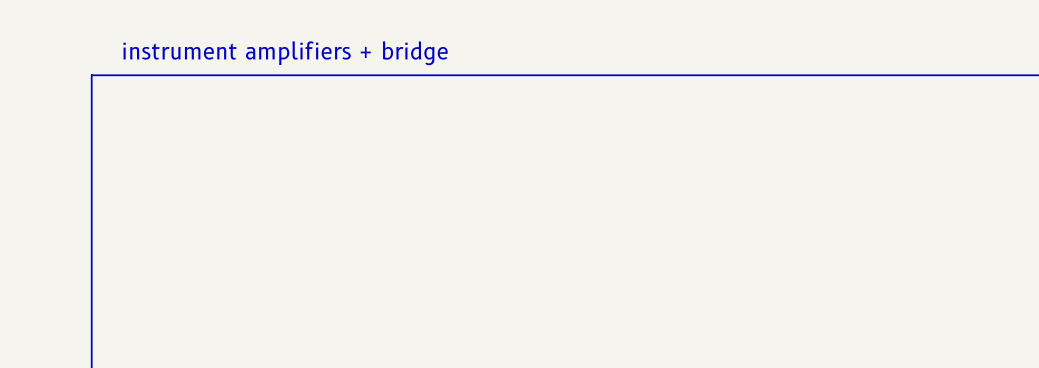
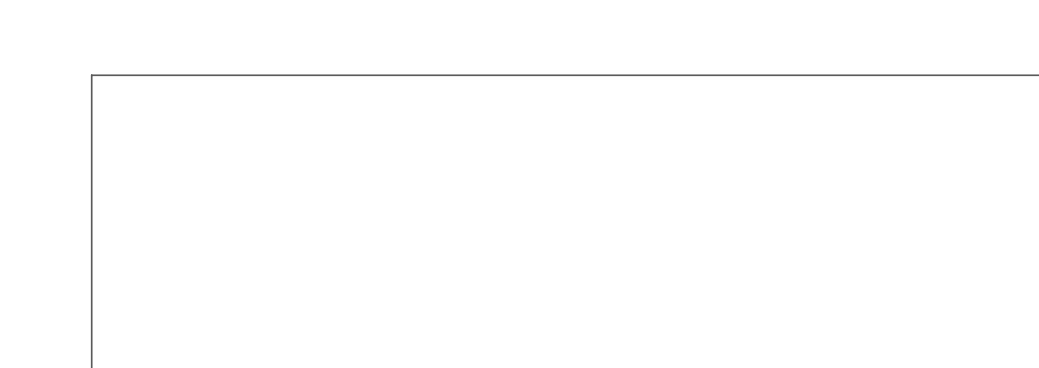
text: instrument amplifiers + bridge (285, 53) -> none

